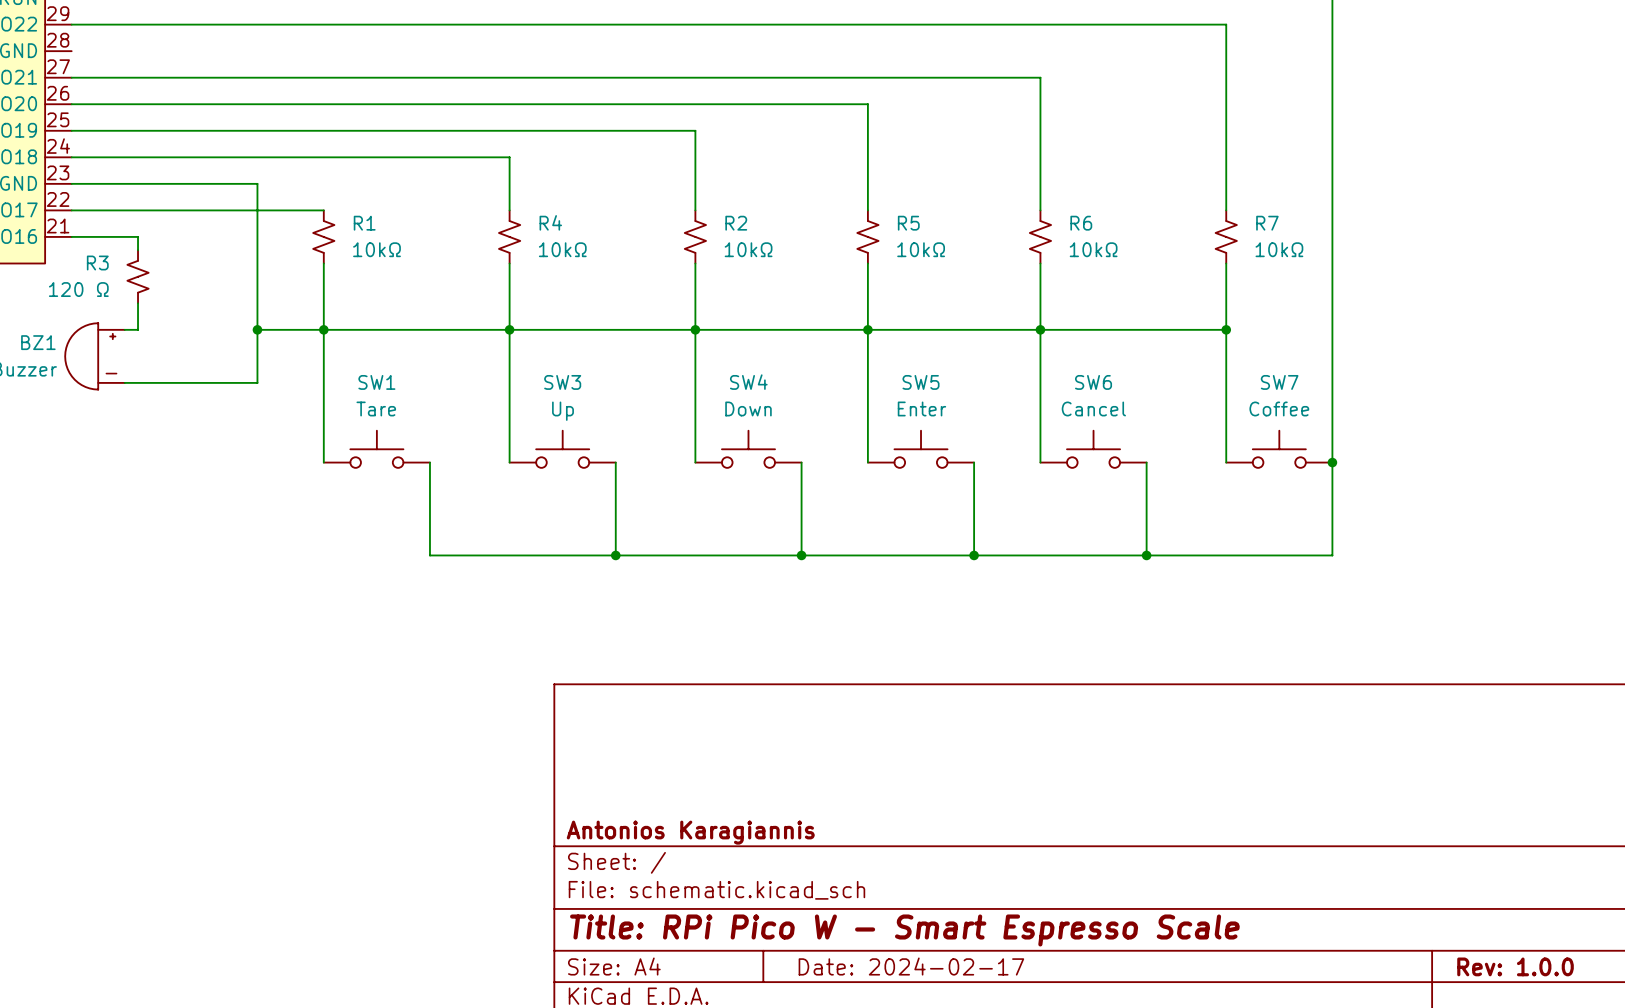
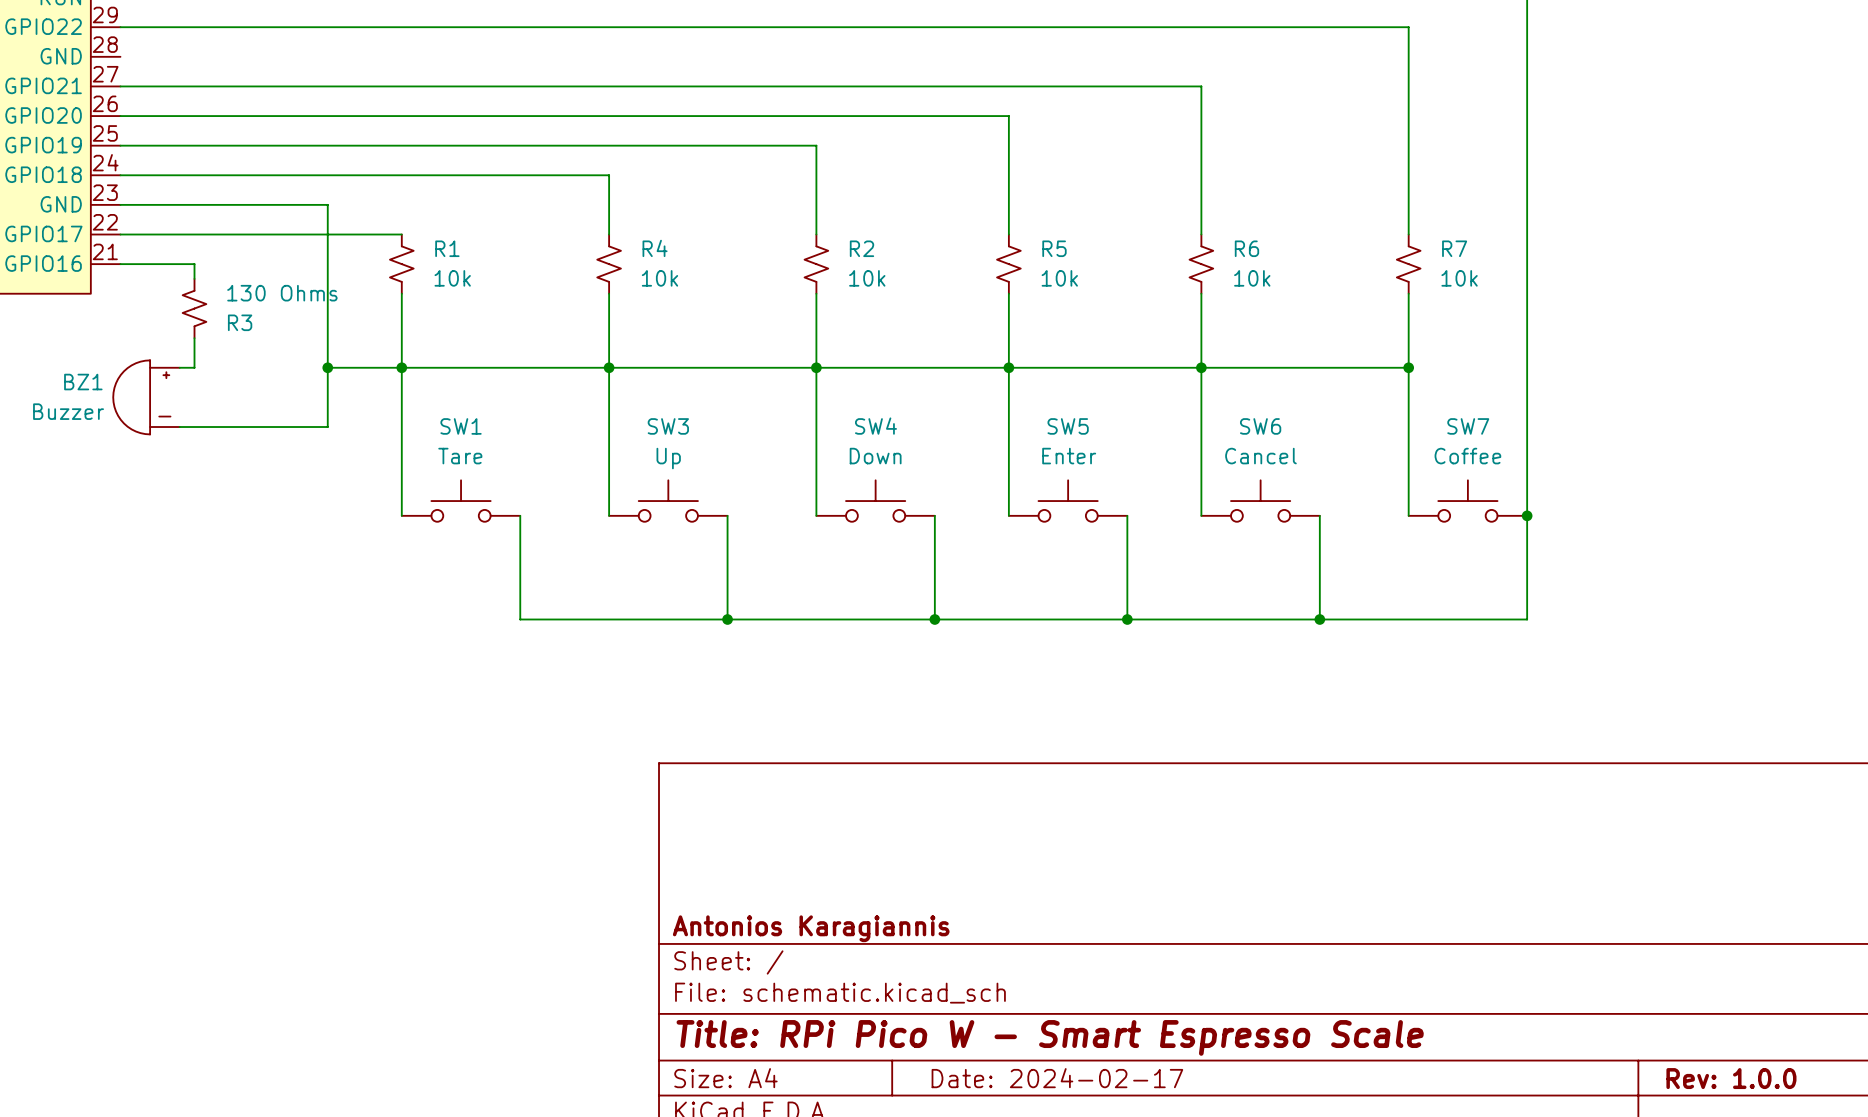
R1 value: 10kΩ (376, 249) -> 10k (452, 278)
R4 value: 10kΩ (562, 249) -> 10k (659, 278)
R2 value: 10kΩ (748, 249) -> 10k (867, 278)
R5 value: 10kΩ (921, 249) -> 10k (1059, 278)
R6 value: 10kΩ (1093, 249) -> 10k (1252, 278)
R7 value: 10kΩ (1279, 249) -> 10k (1459, 278)
R3 name position: R3 (97, 263) -> R3 (240, 322)
R3 value: 120 Ω (78, 289) -> 130 Ohms (282, 293)

